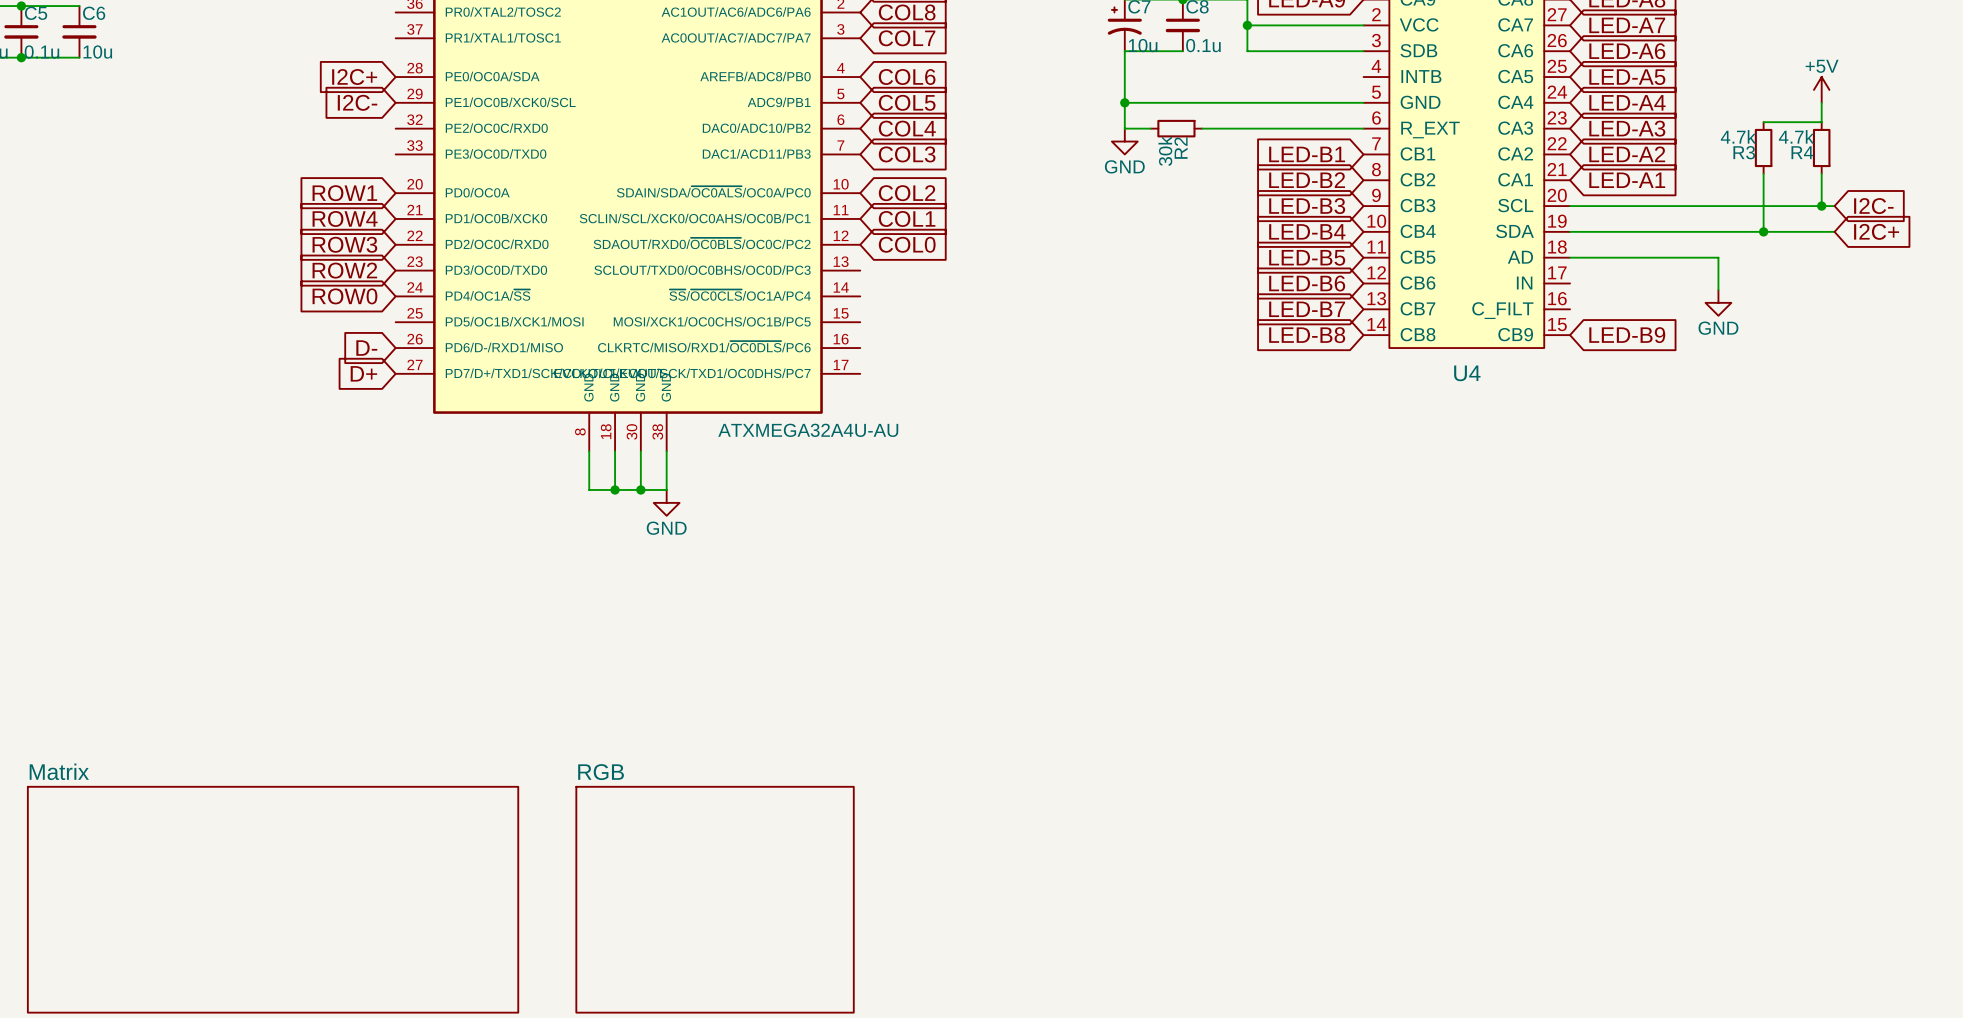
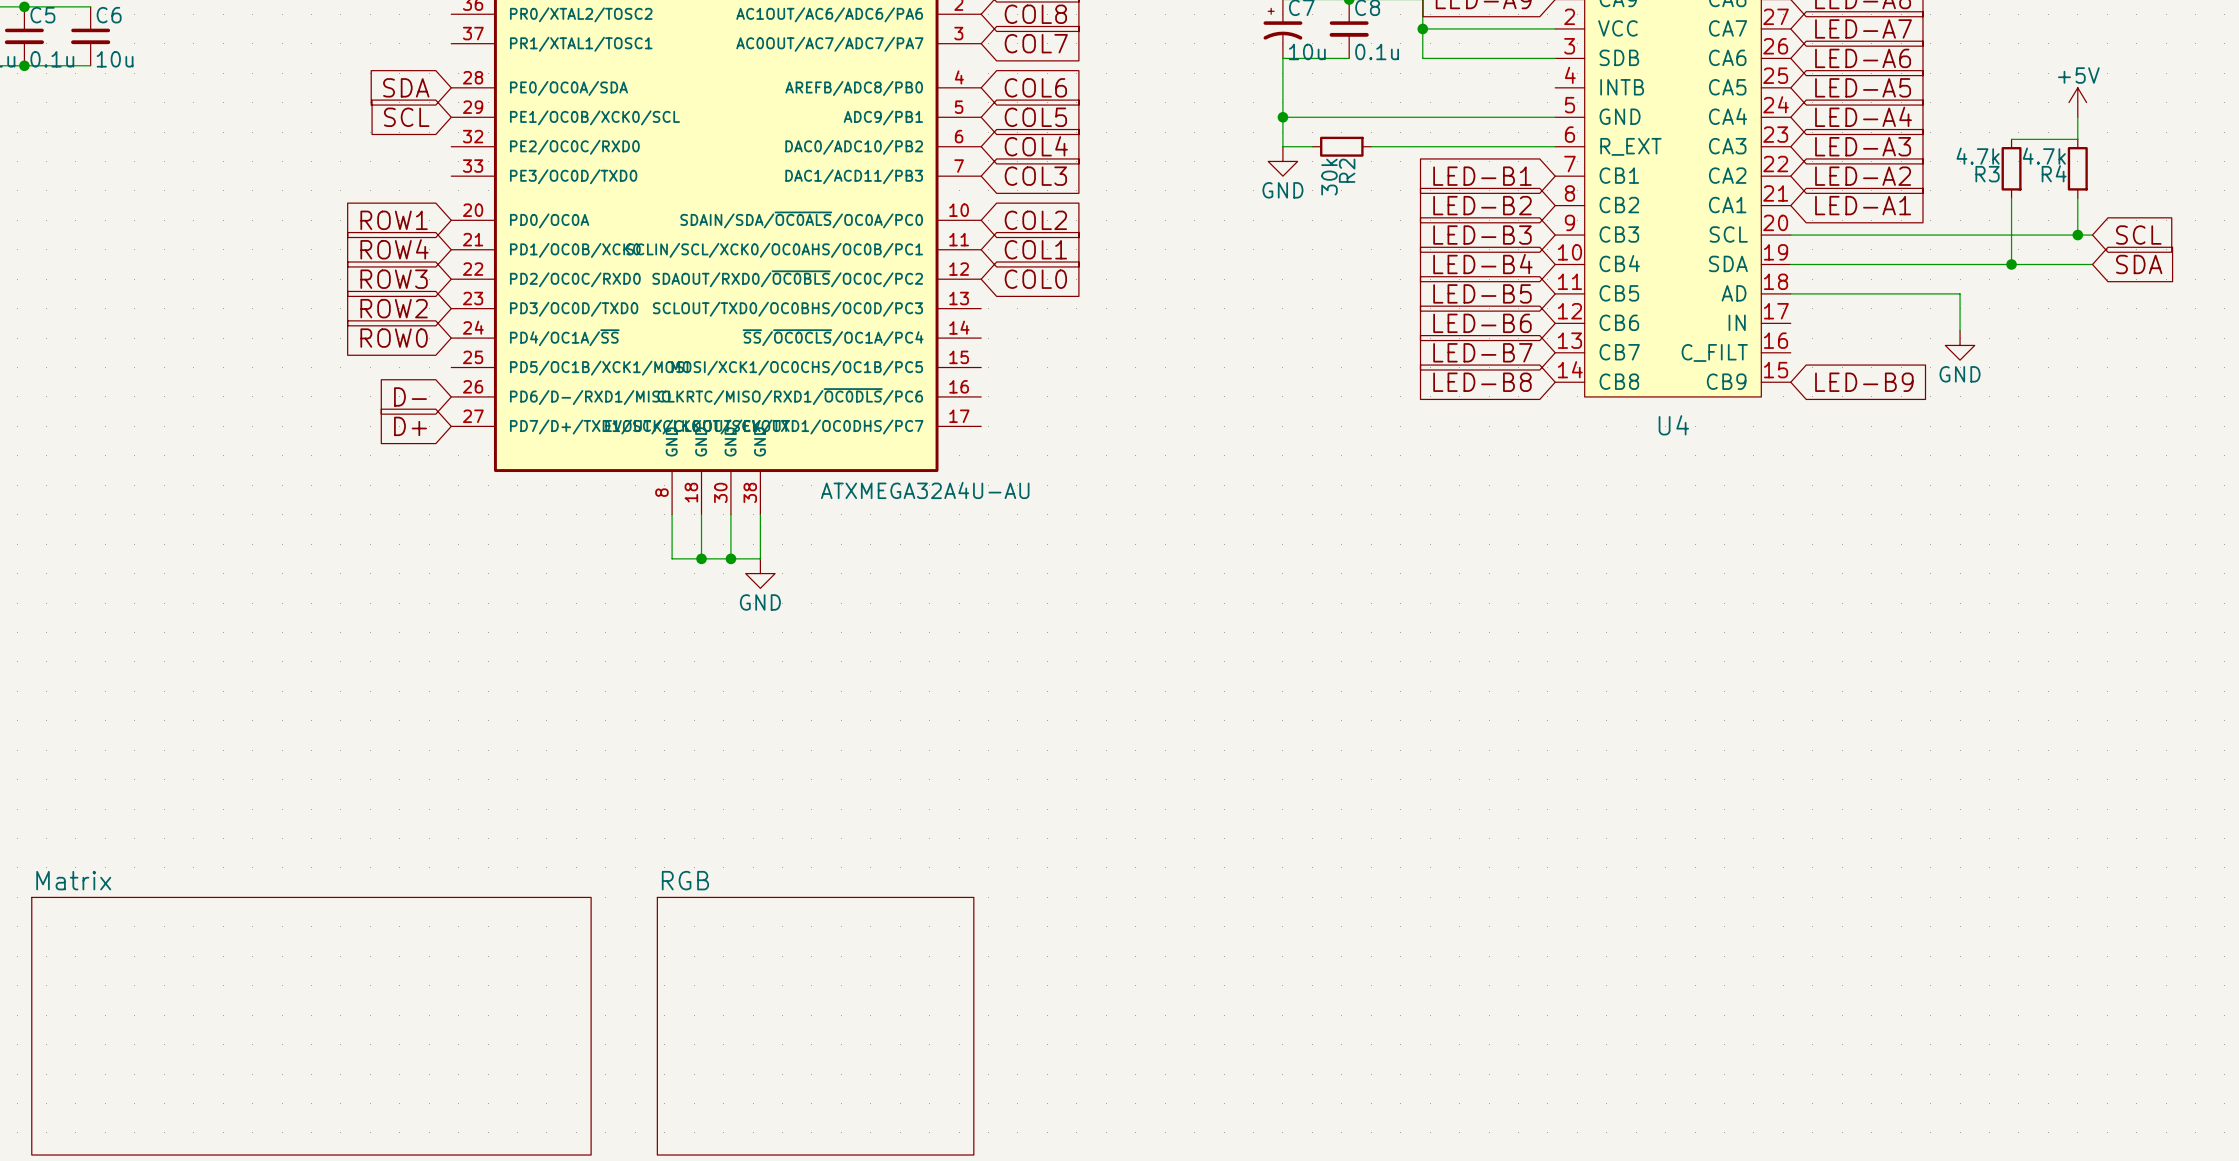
global label: I2C+ (354, 77) -> SDA (406, 87)
global label: I2C- (357, 102) -> SCL (406, 117)
global label: I2C- (1873, 206) -> SCL (2138, 235)
global label: I2C+ (1876, 231) -> SDA (2139, 264)

